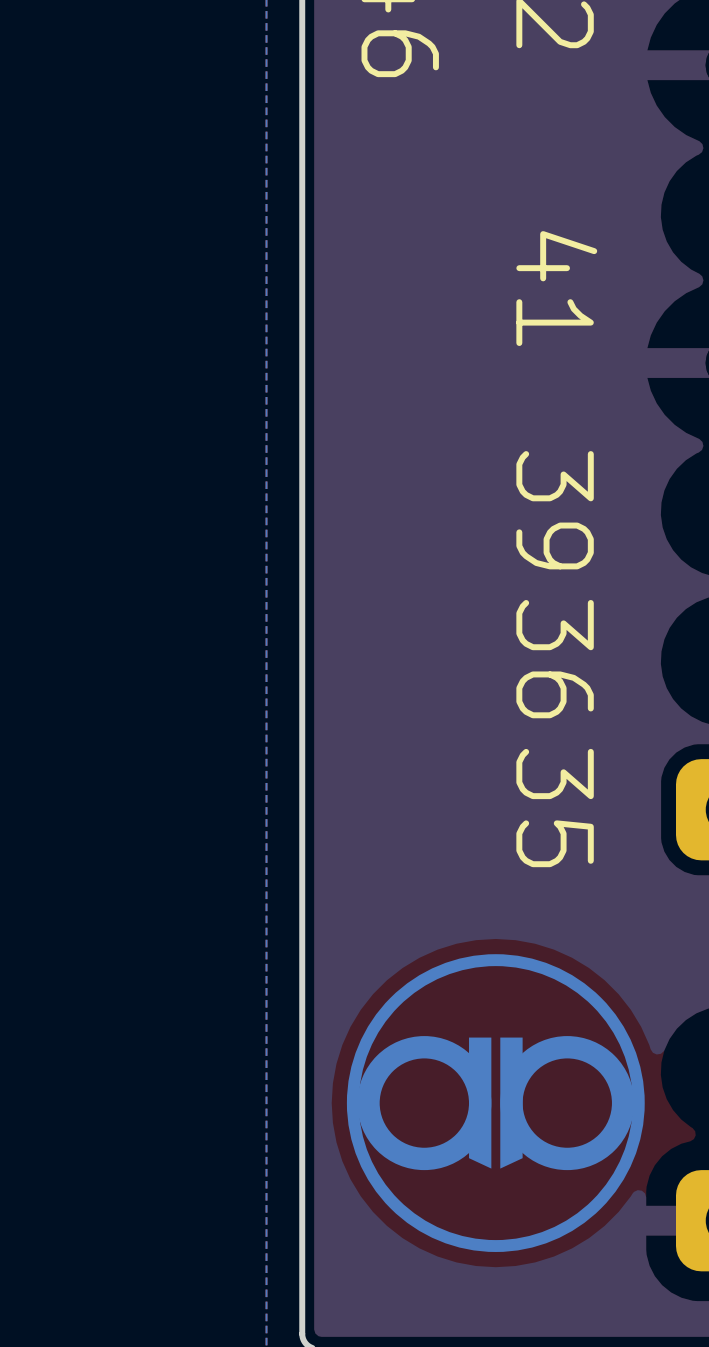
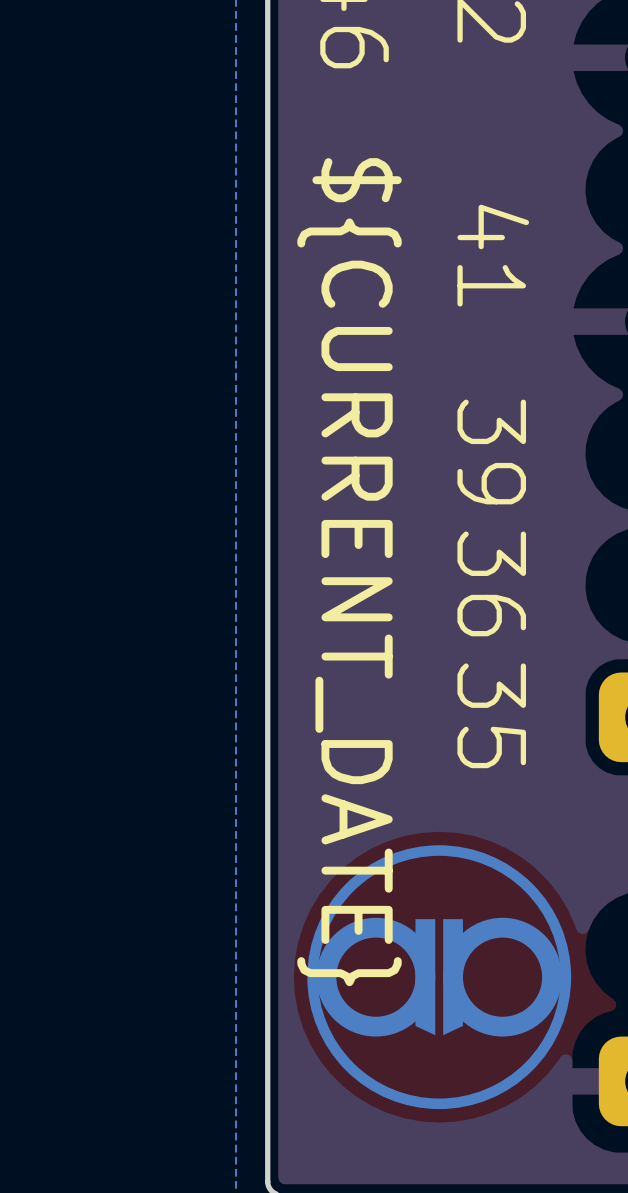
text: none -> ${CURRENT_DATE} (349, 572)

